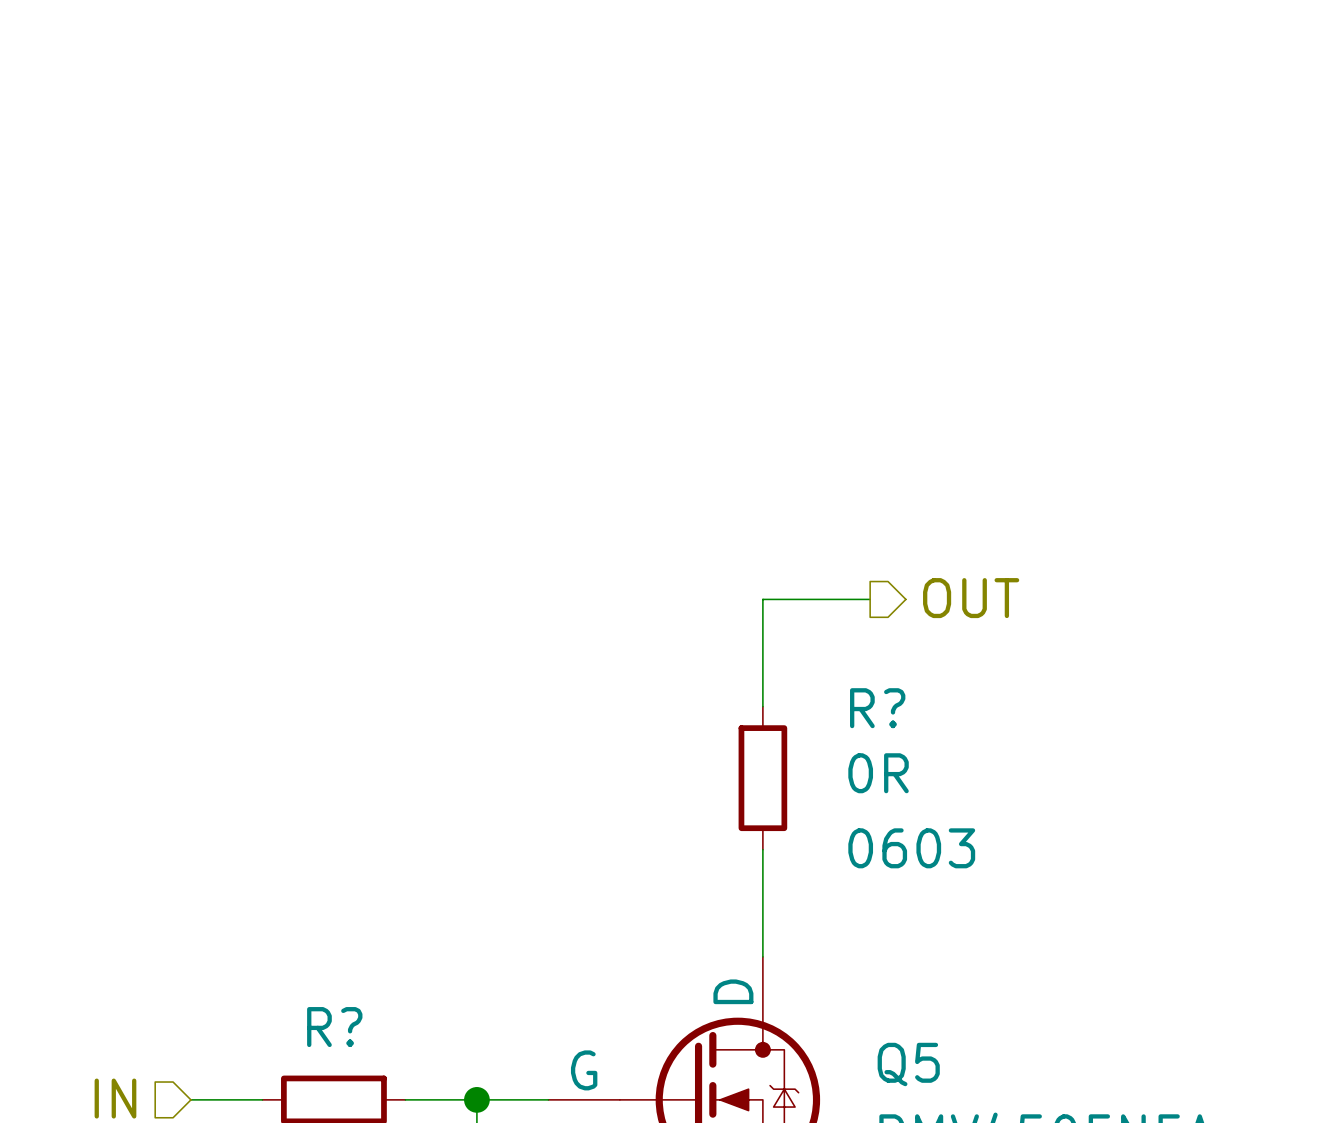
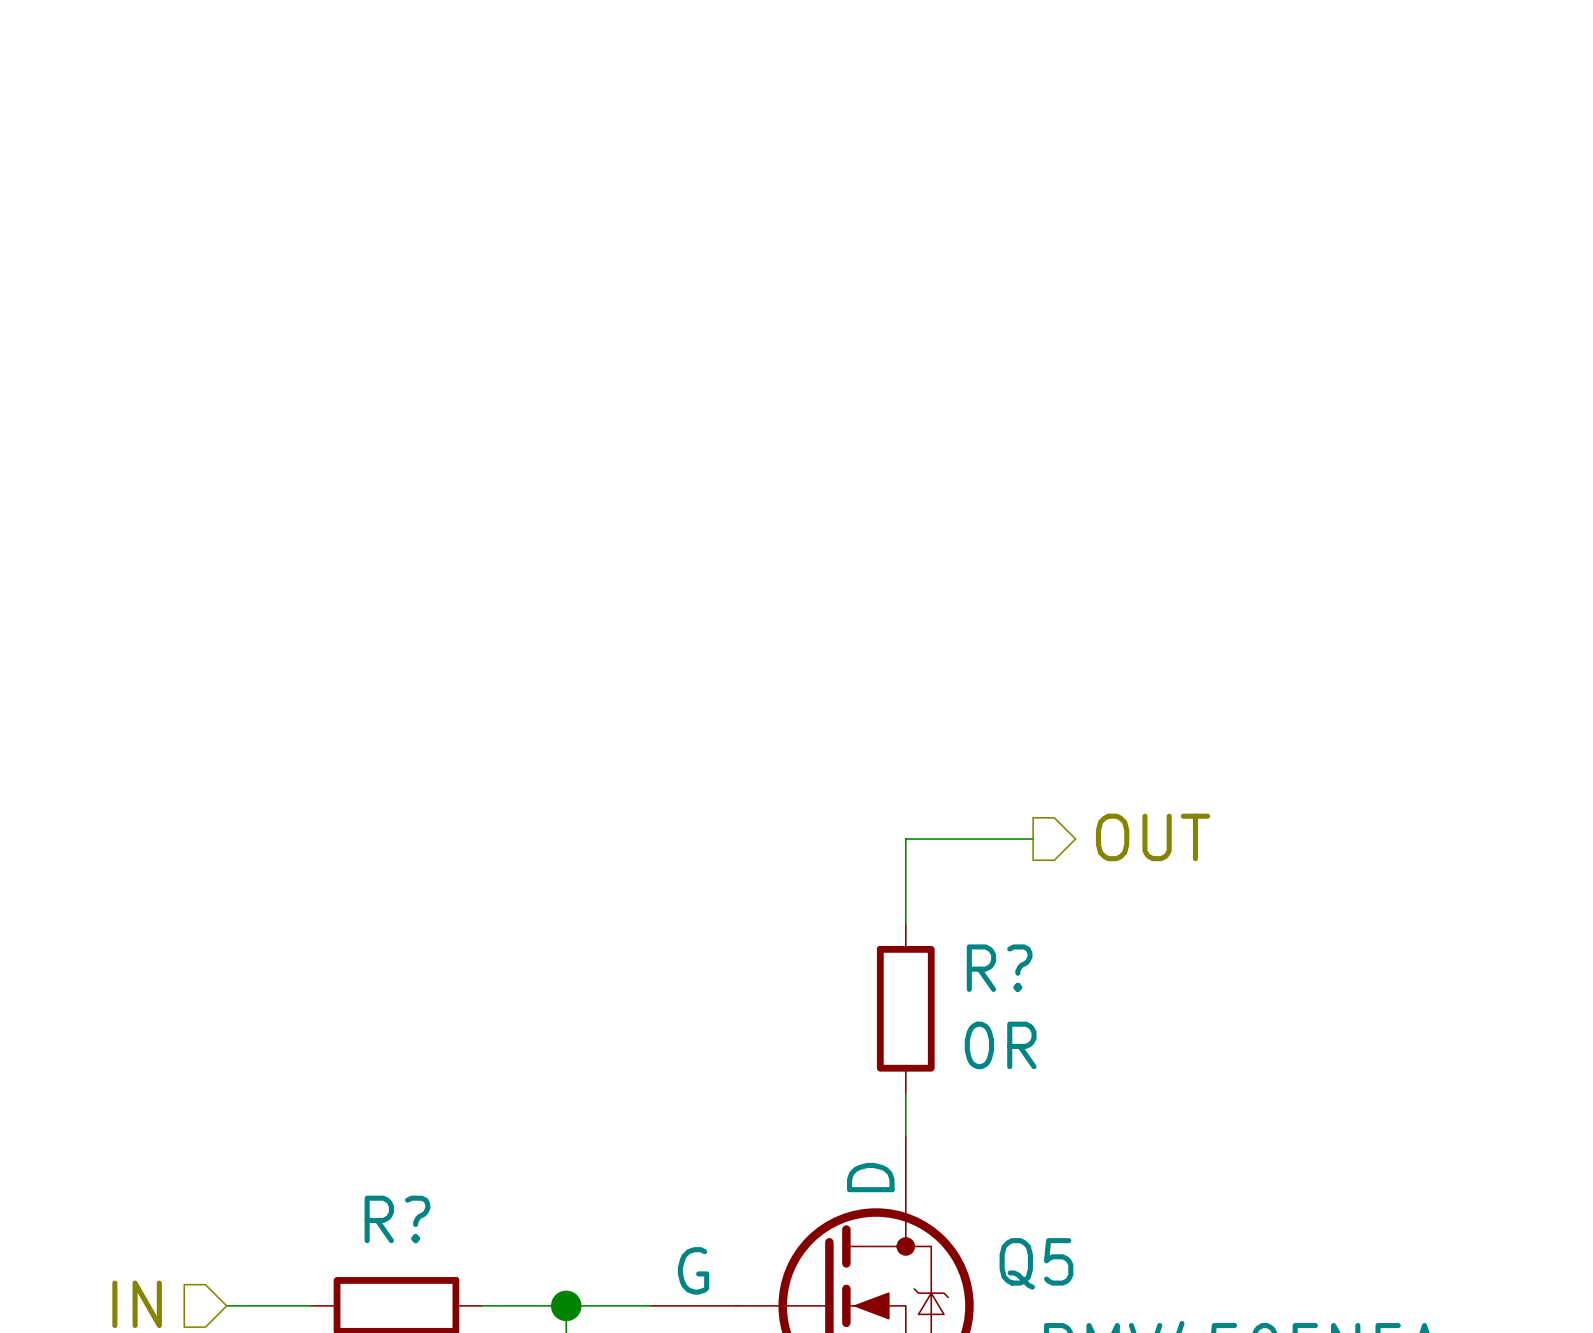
hierarchical label position: OUT (971, 598) -> OUT (1153, 837)
wire: (870, 599) (762, 599) (762, 706) -> none
wire: none -> (1033, 839) (905, 839) (905, 923)
R?: 0R (762, 778) -> none
wire: (762, 849) (762, 921) -> none
R?: none -> 0R (905, 1008)
Q5 name position: Q5 (908, 1064) -> Q5 (1036, 1263)

